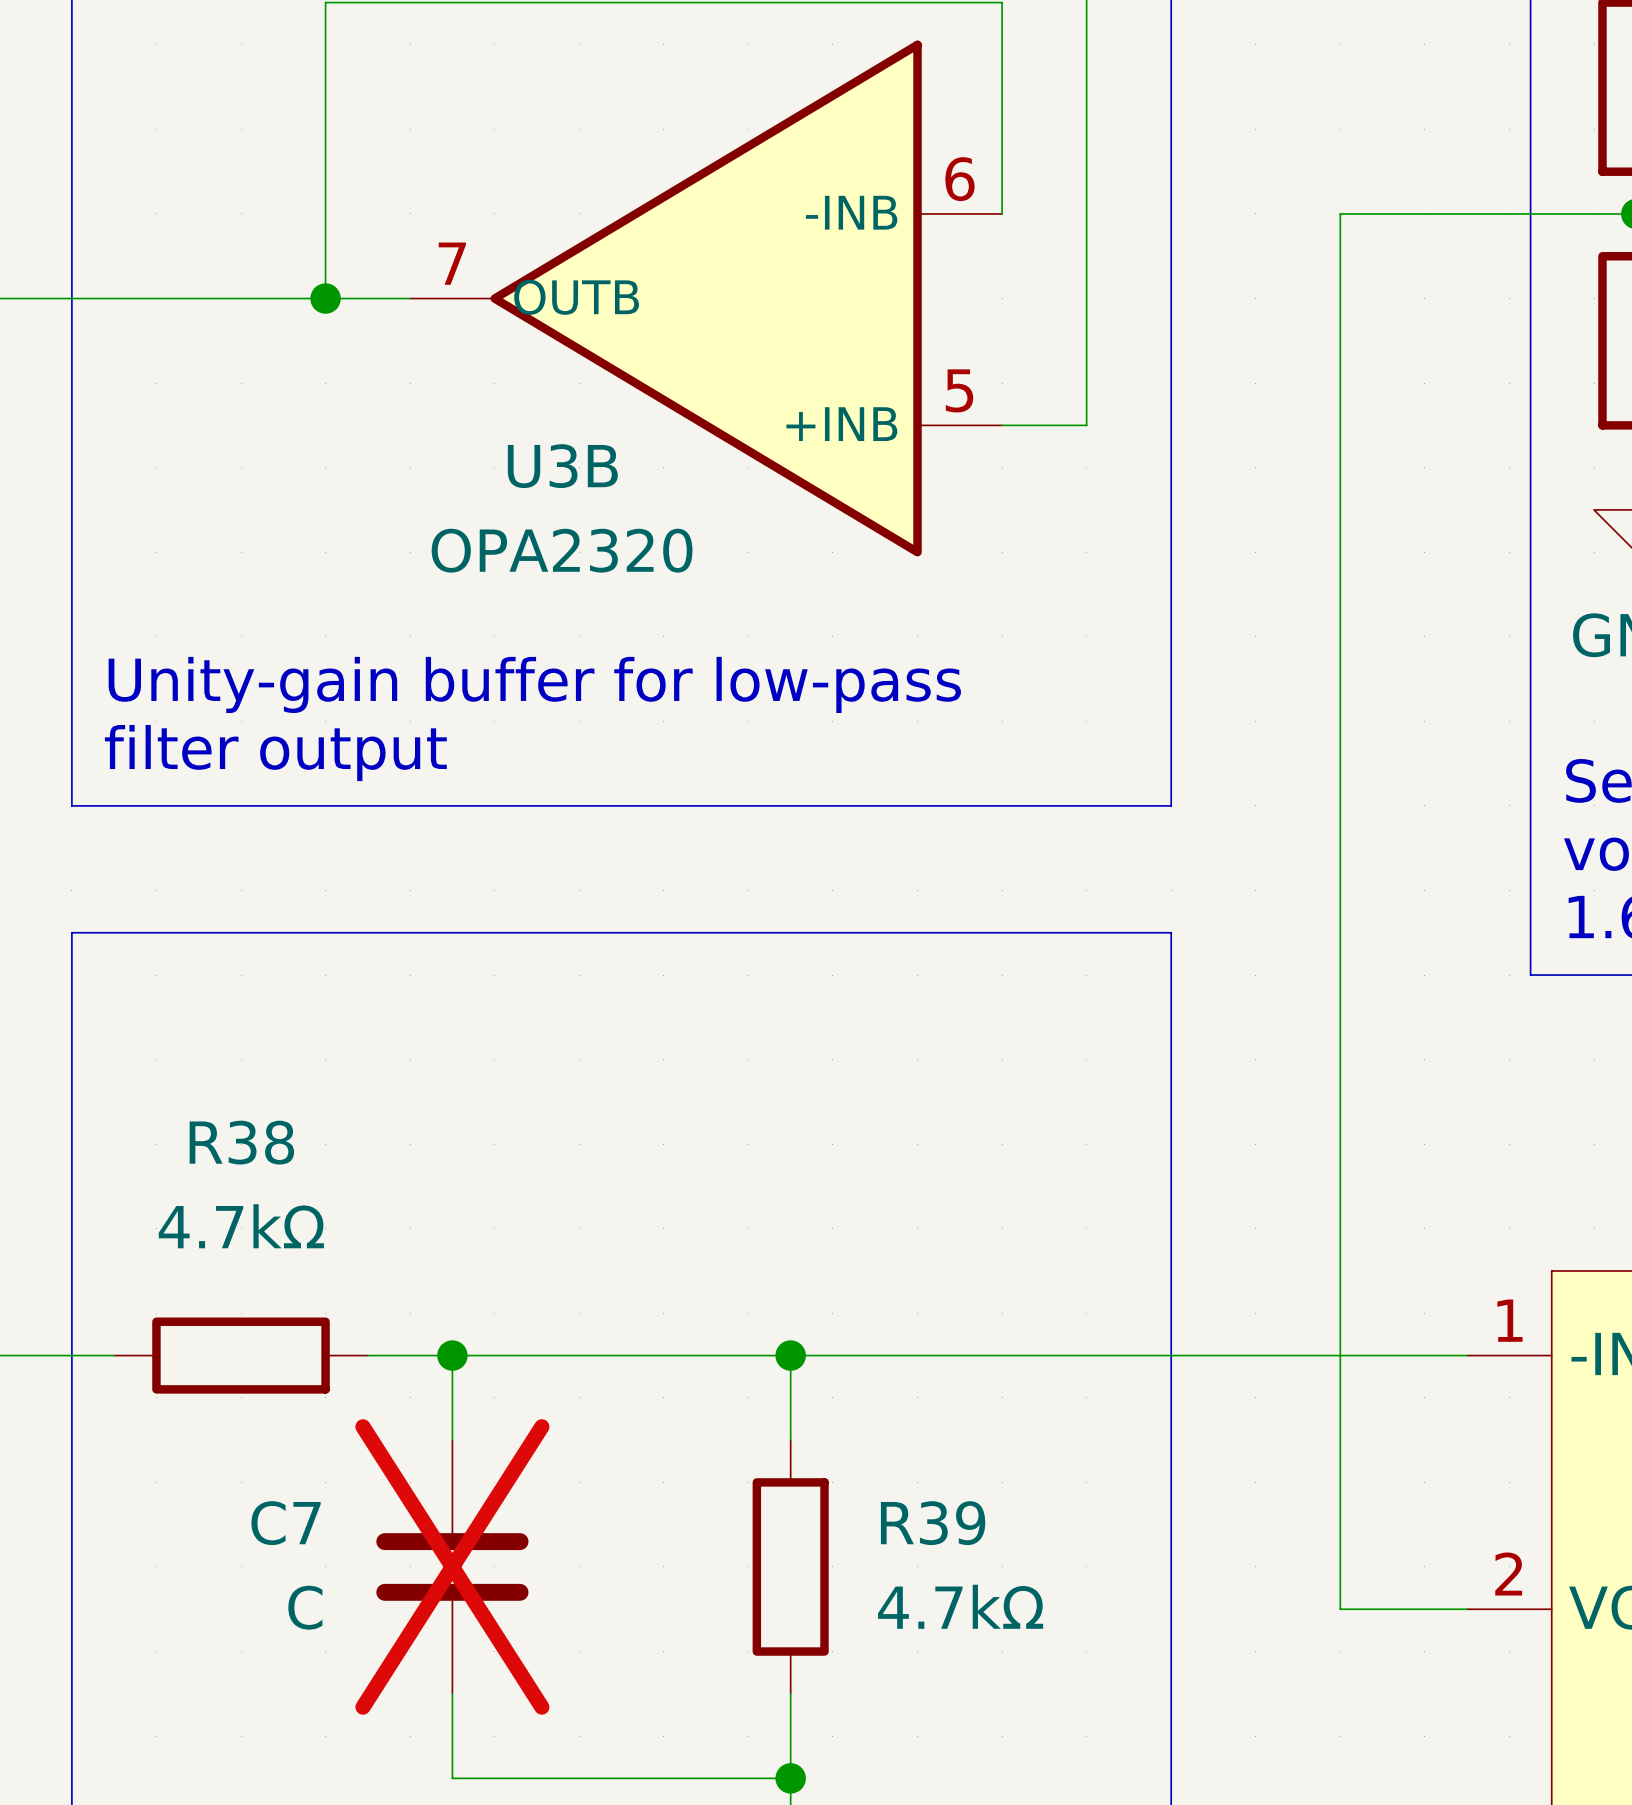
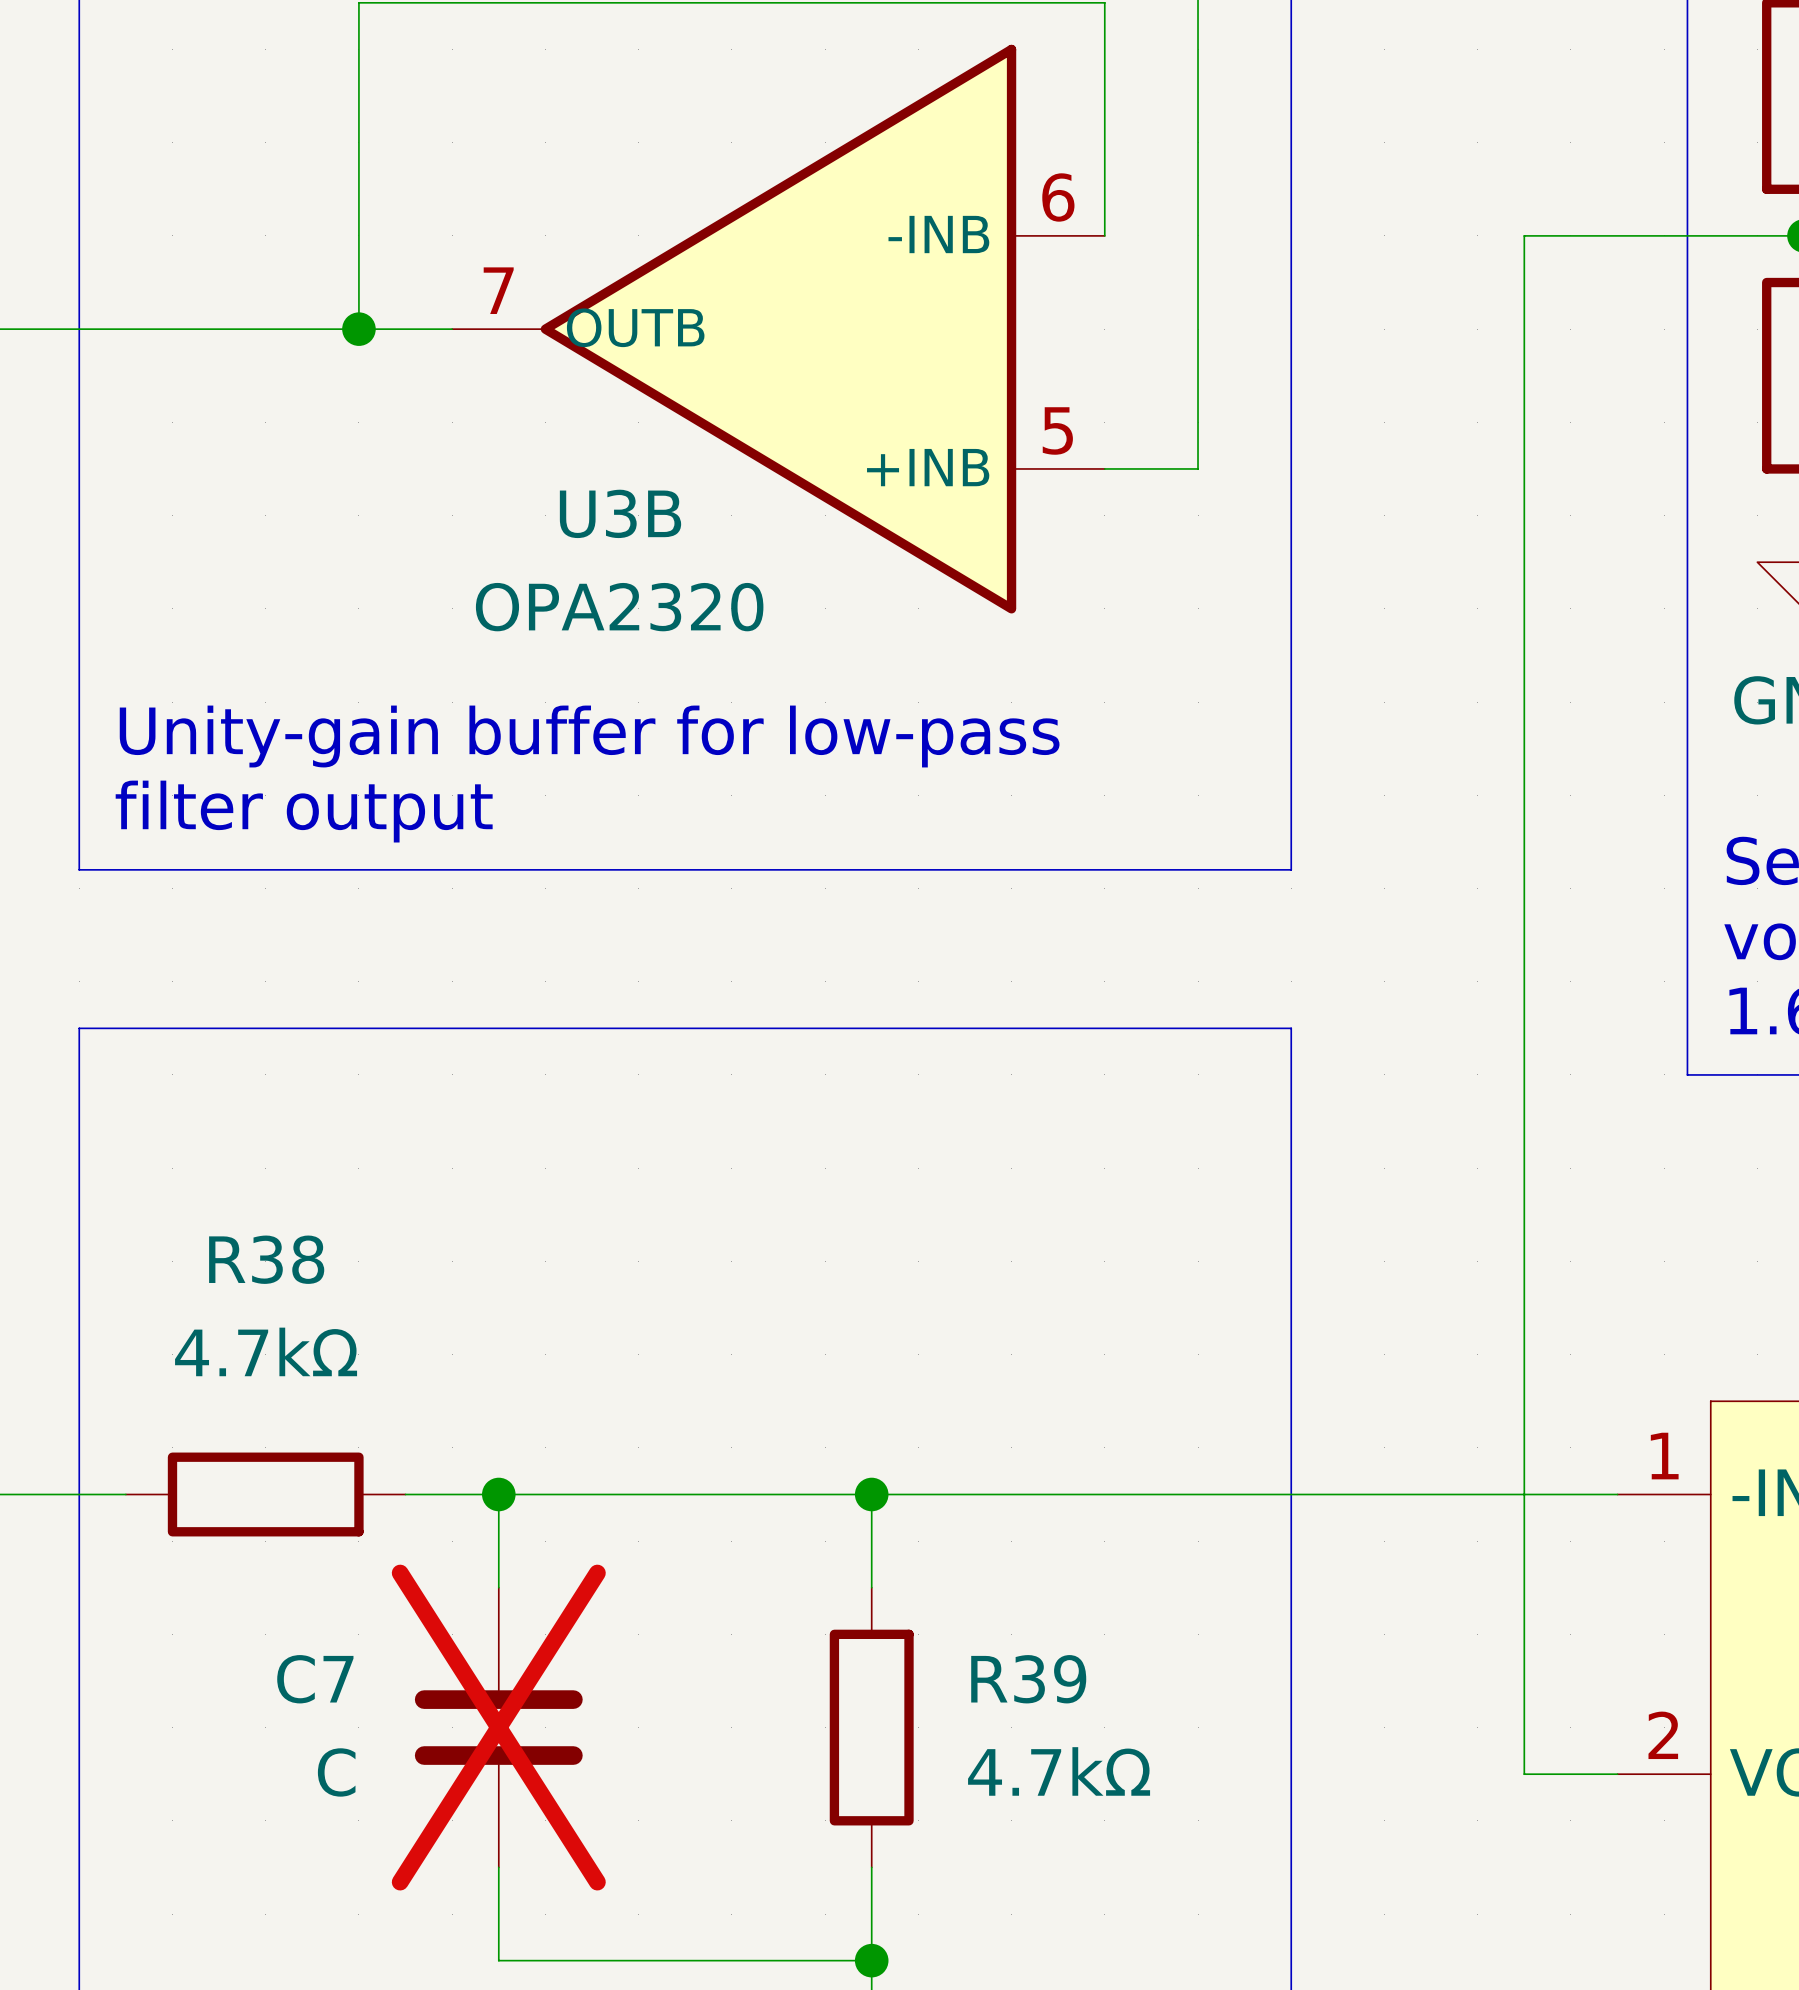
wire: (1382, 213) (1340, 213) (1340, 1609) (1382, 1609) -> (1524, 235) (1524, 1774)
text position: Unity-gain buffer for low-pass (534, 684) -> Unity-gain buffer for low-pass (589, 736)
text position: filter output (275, 753) -> filter output (304, 811)
line: (71, 789) (71, 805) (1171, 805) (1171, 789) -> (79, 869) (1291, 869)

